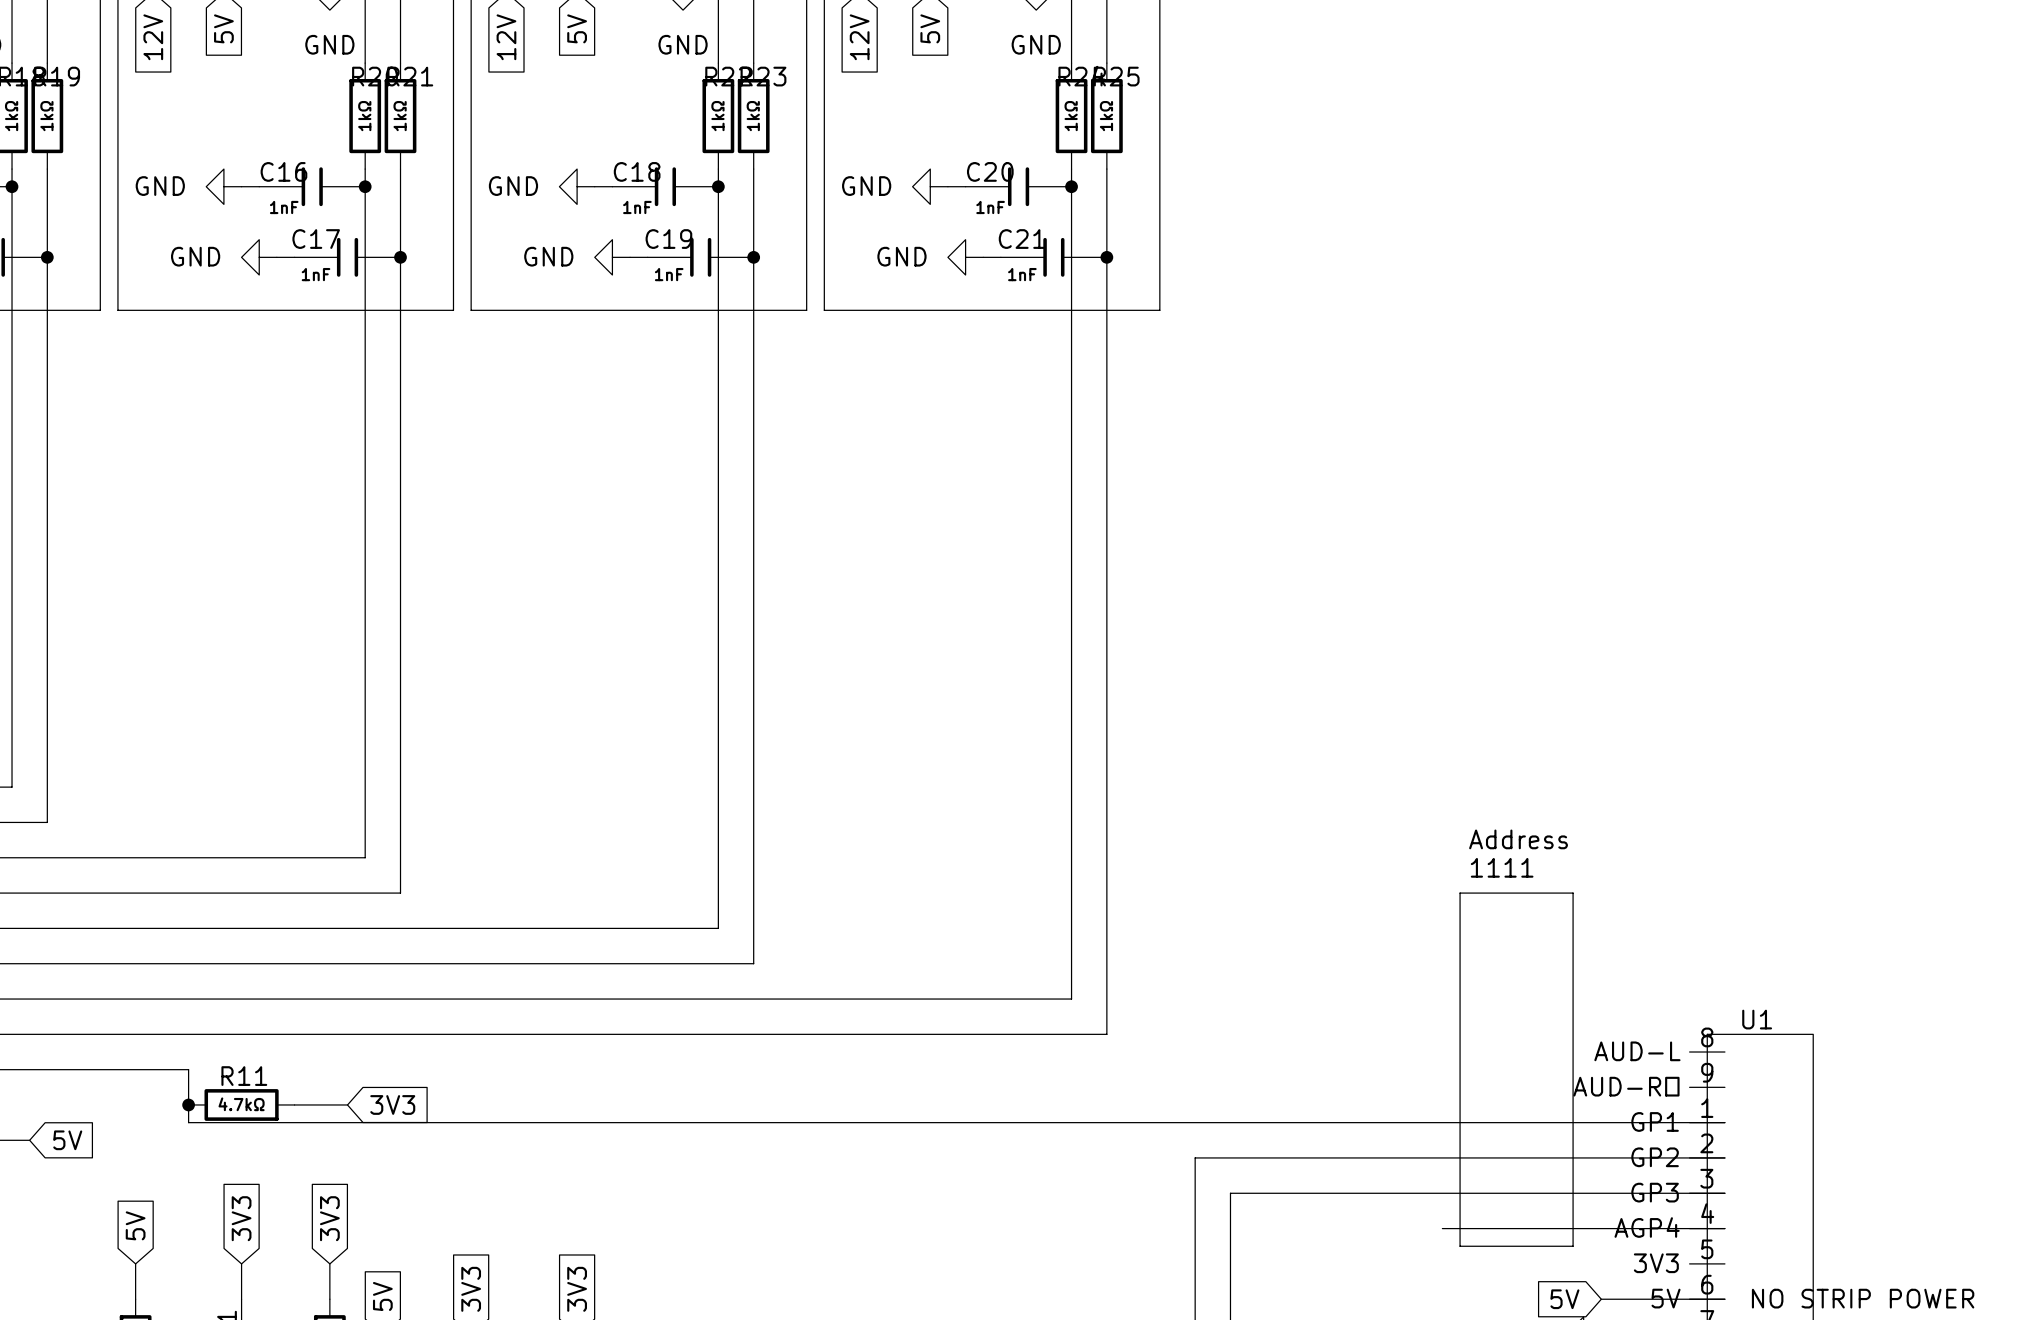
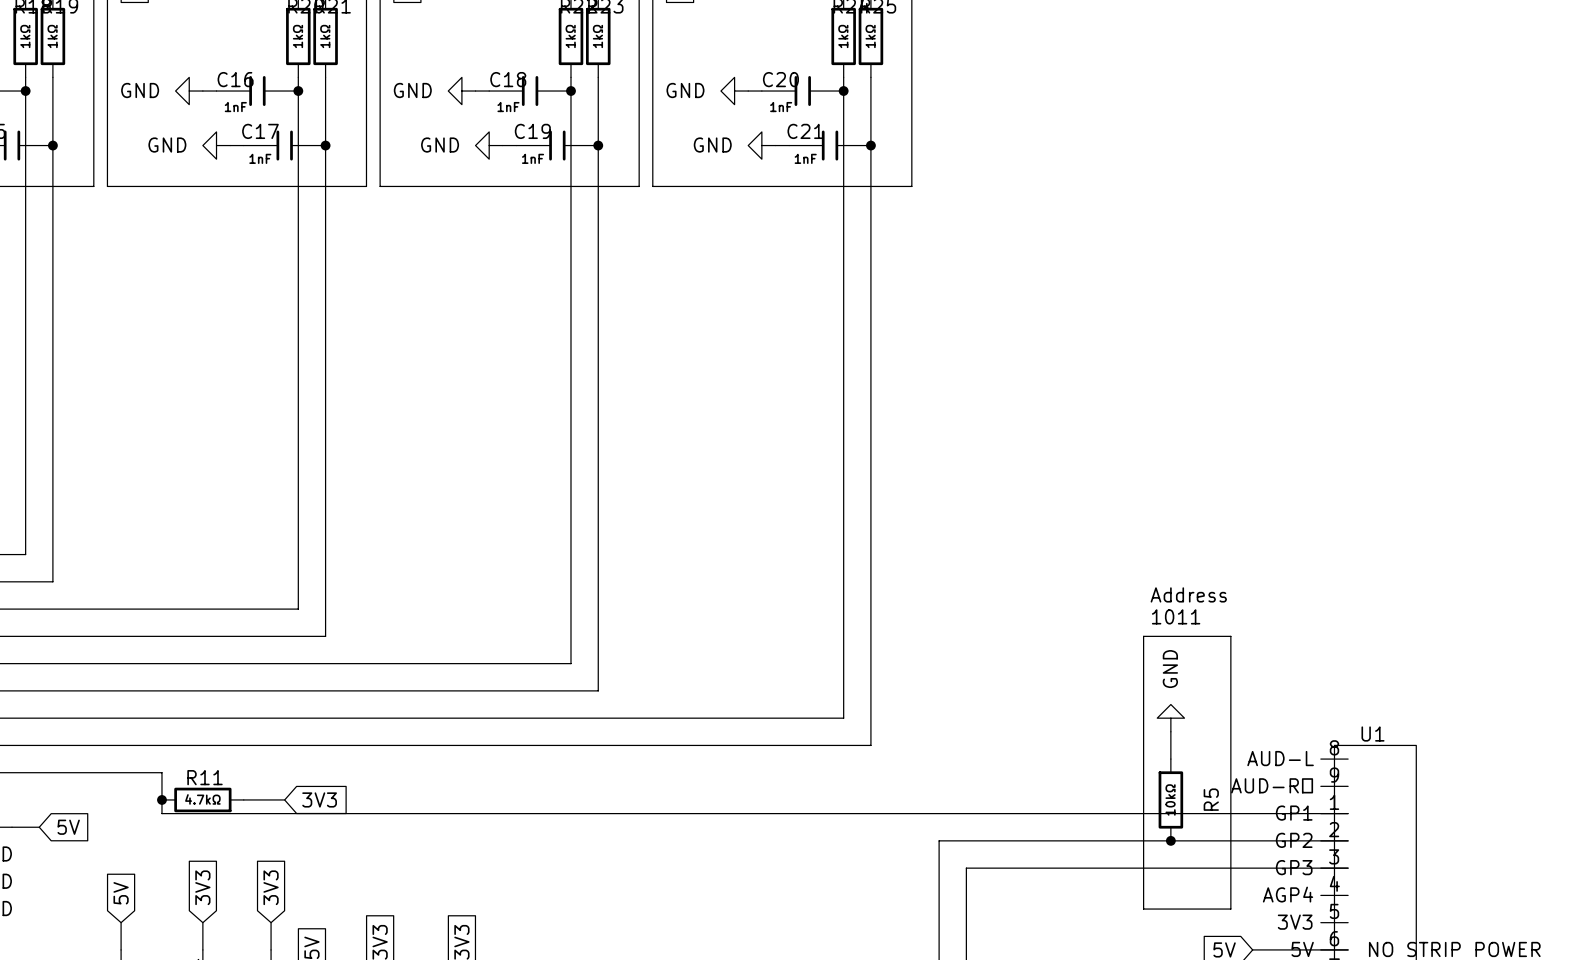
text: 1111 (1502, 867) -> 1011 (1176, 616)
power symbol: none -> GND (1170, 718)
wire: none -> (1170, 731) (1170, 759)
R5: none -> 10kΩ (1170, 799)
junction: none -> (1170, 840)
wire: (1442, 1228) (1724, 1228) -> none

